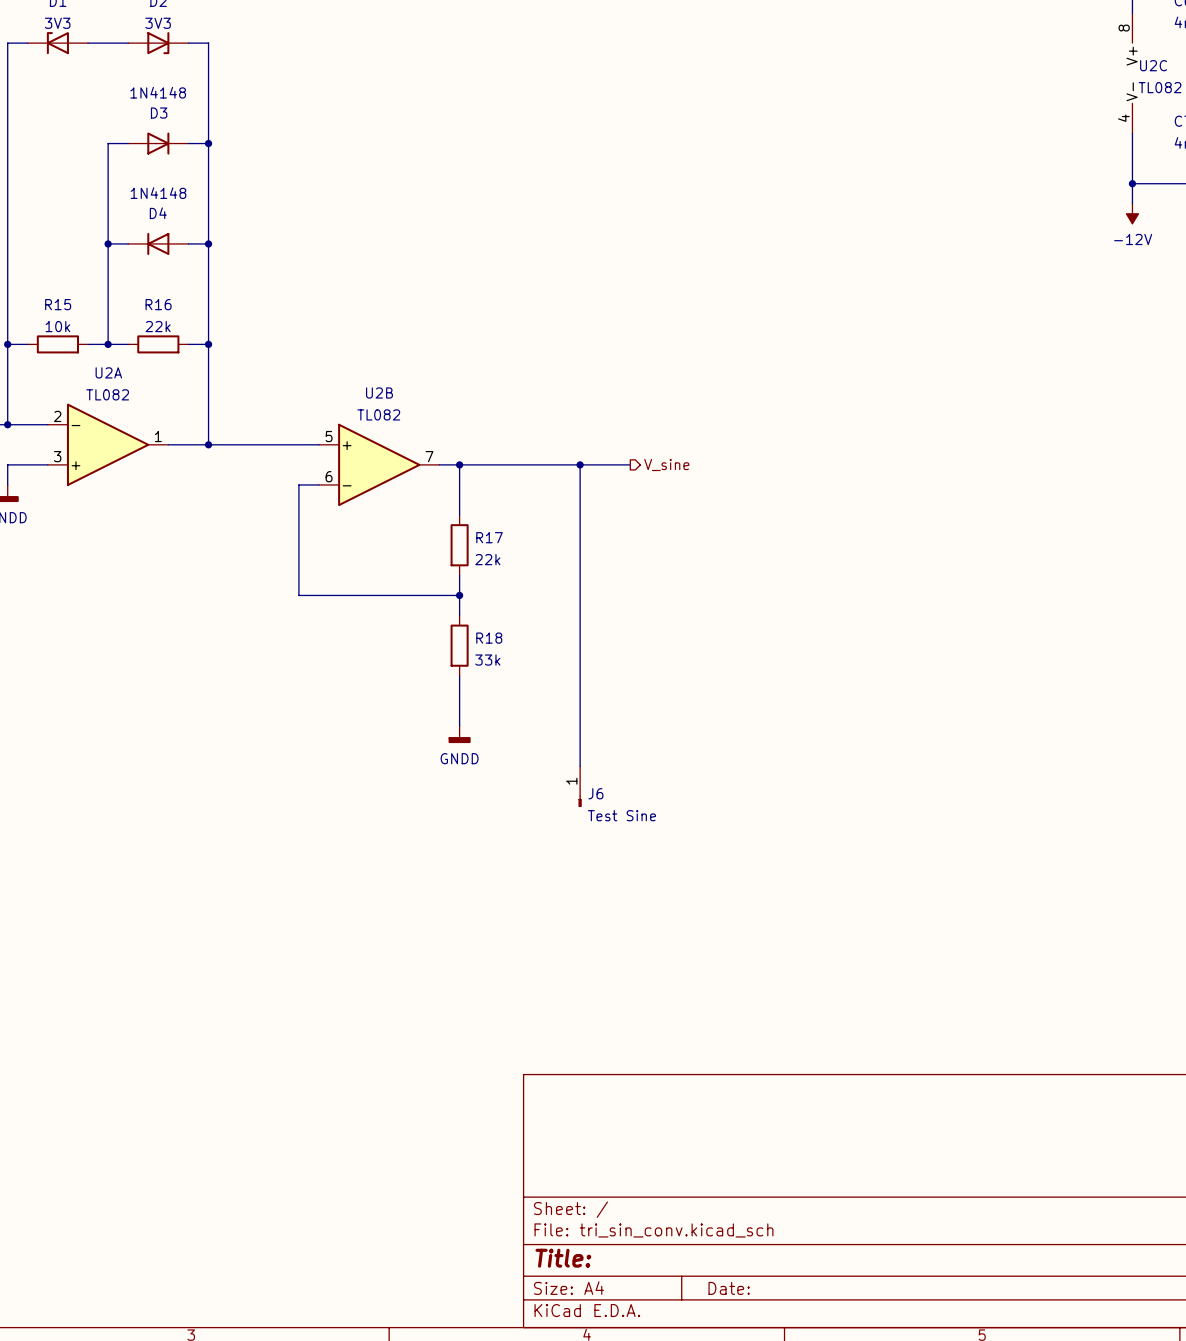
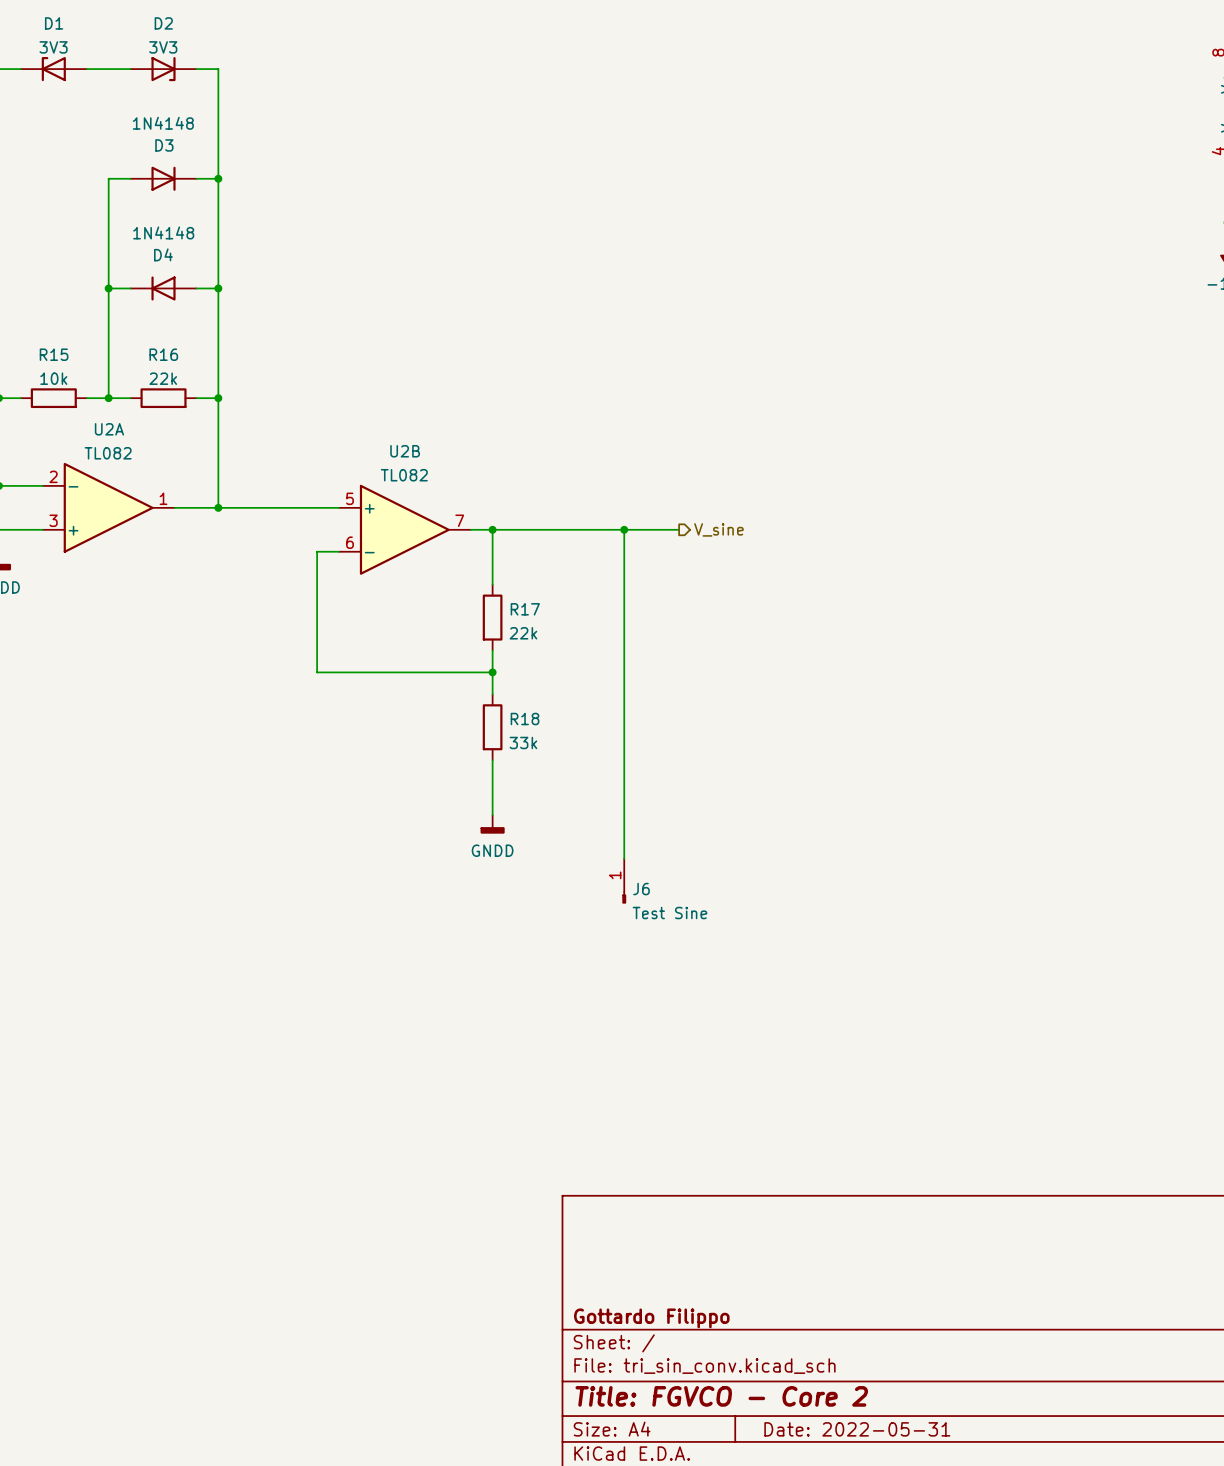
title block: none -> Gottardo Filippo (651, 1318)
title block: Title: (563, 1258) -> Title: FGVCO - Core 2 (721, 1396)
title block: Date: (729, 1288) -> Date: 2022-05-31 (857, 1429)

